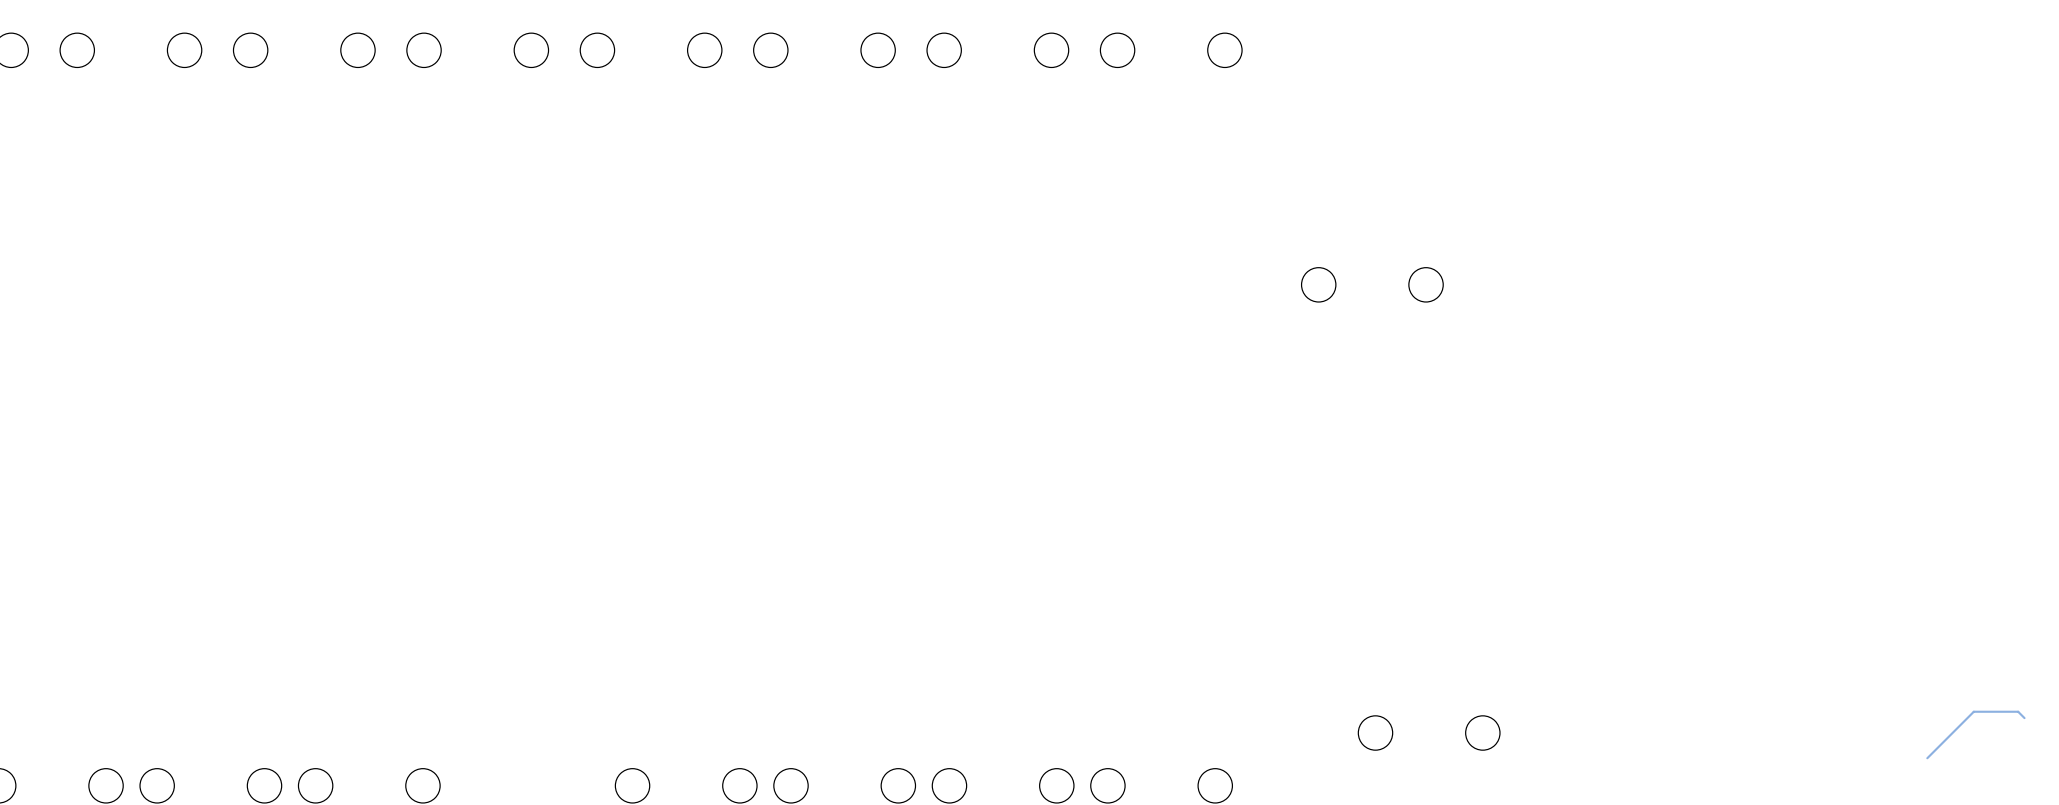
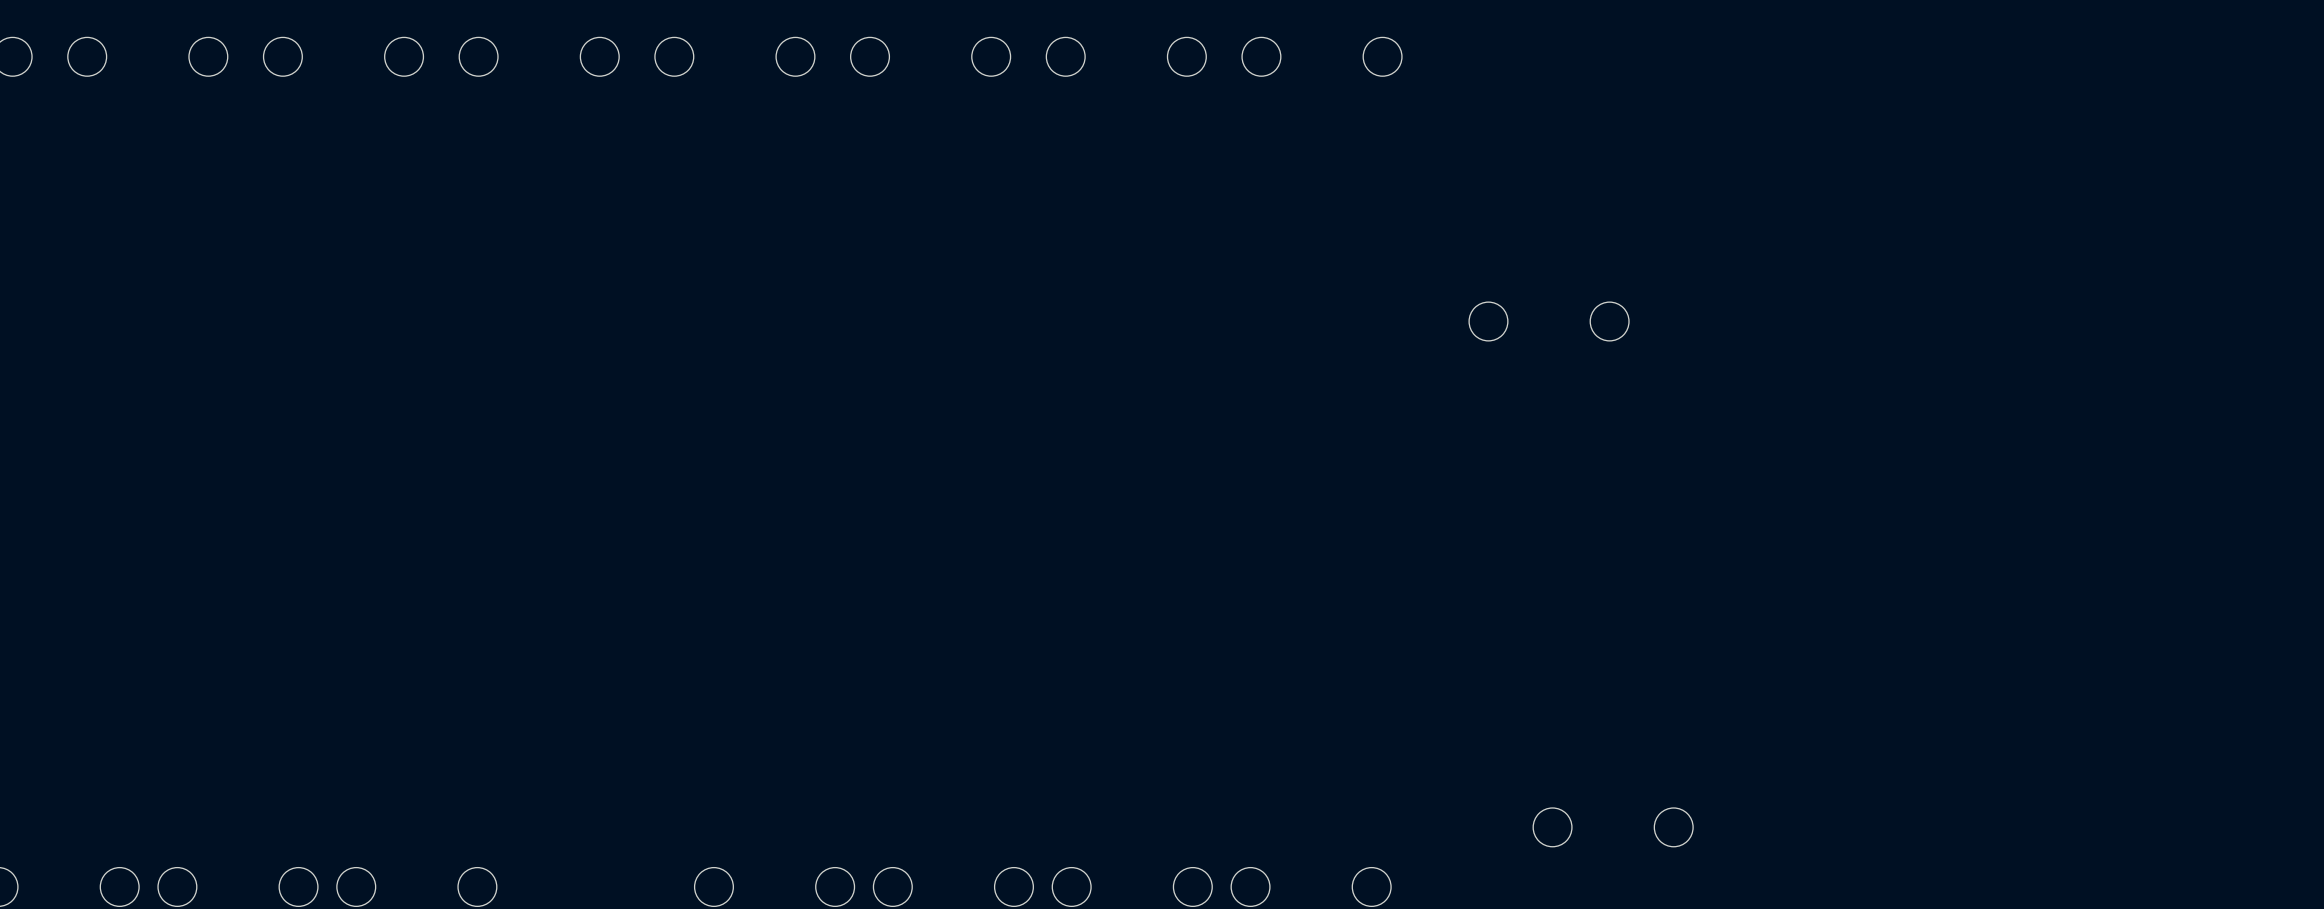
track: (2024, 718) (2018, 711) (1973, 711) (1927, 758) -> none

